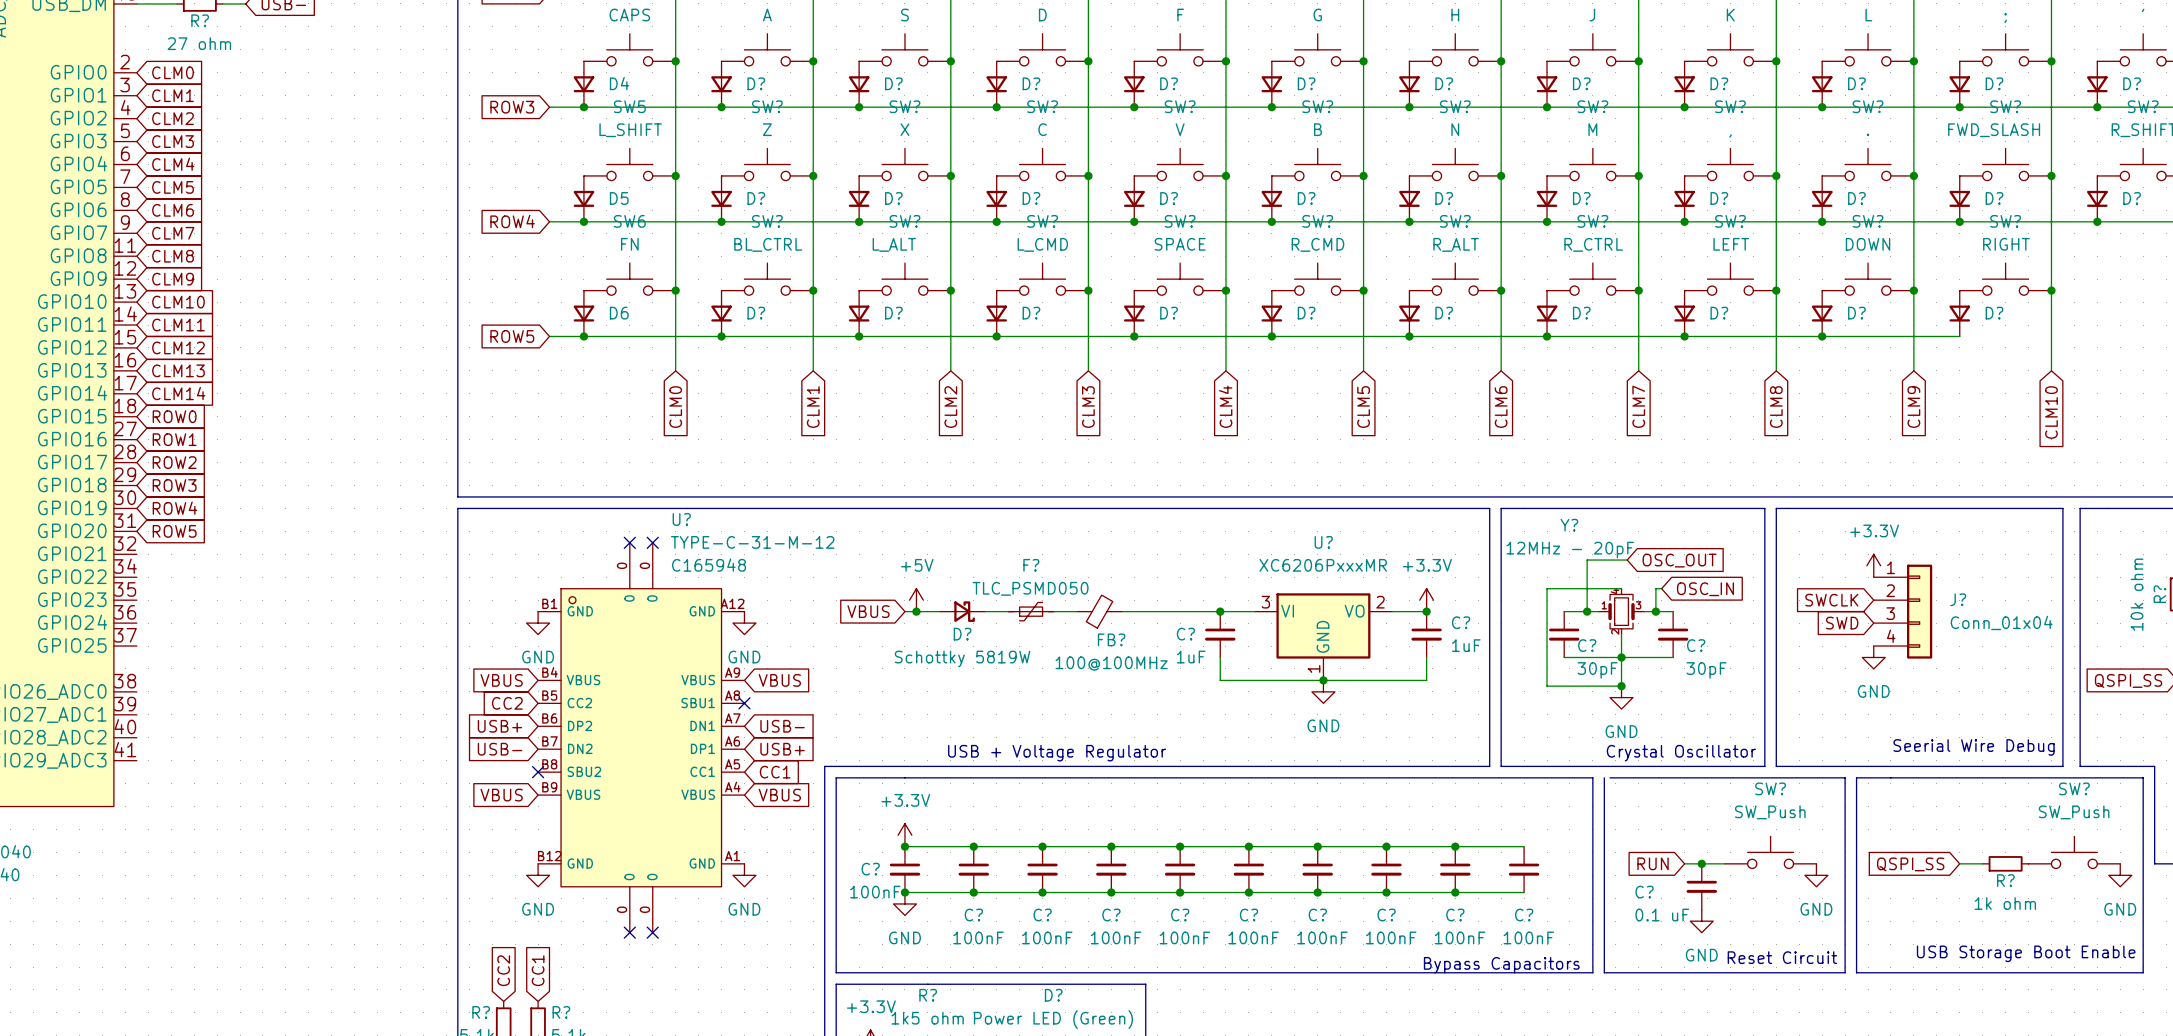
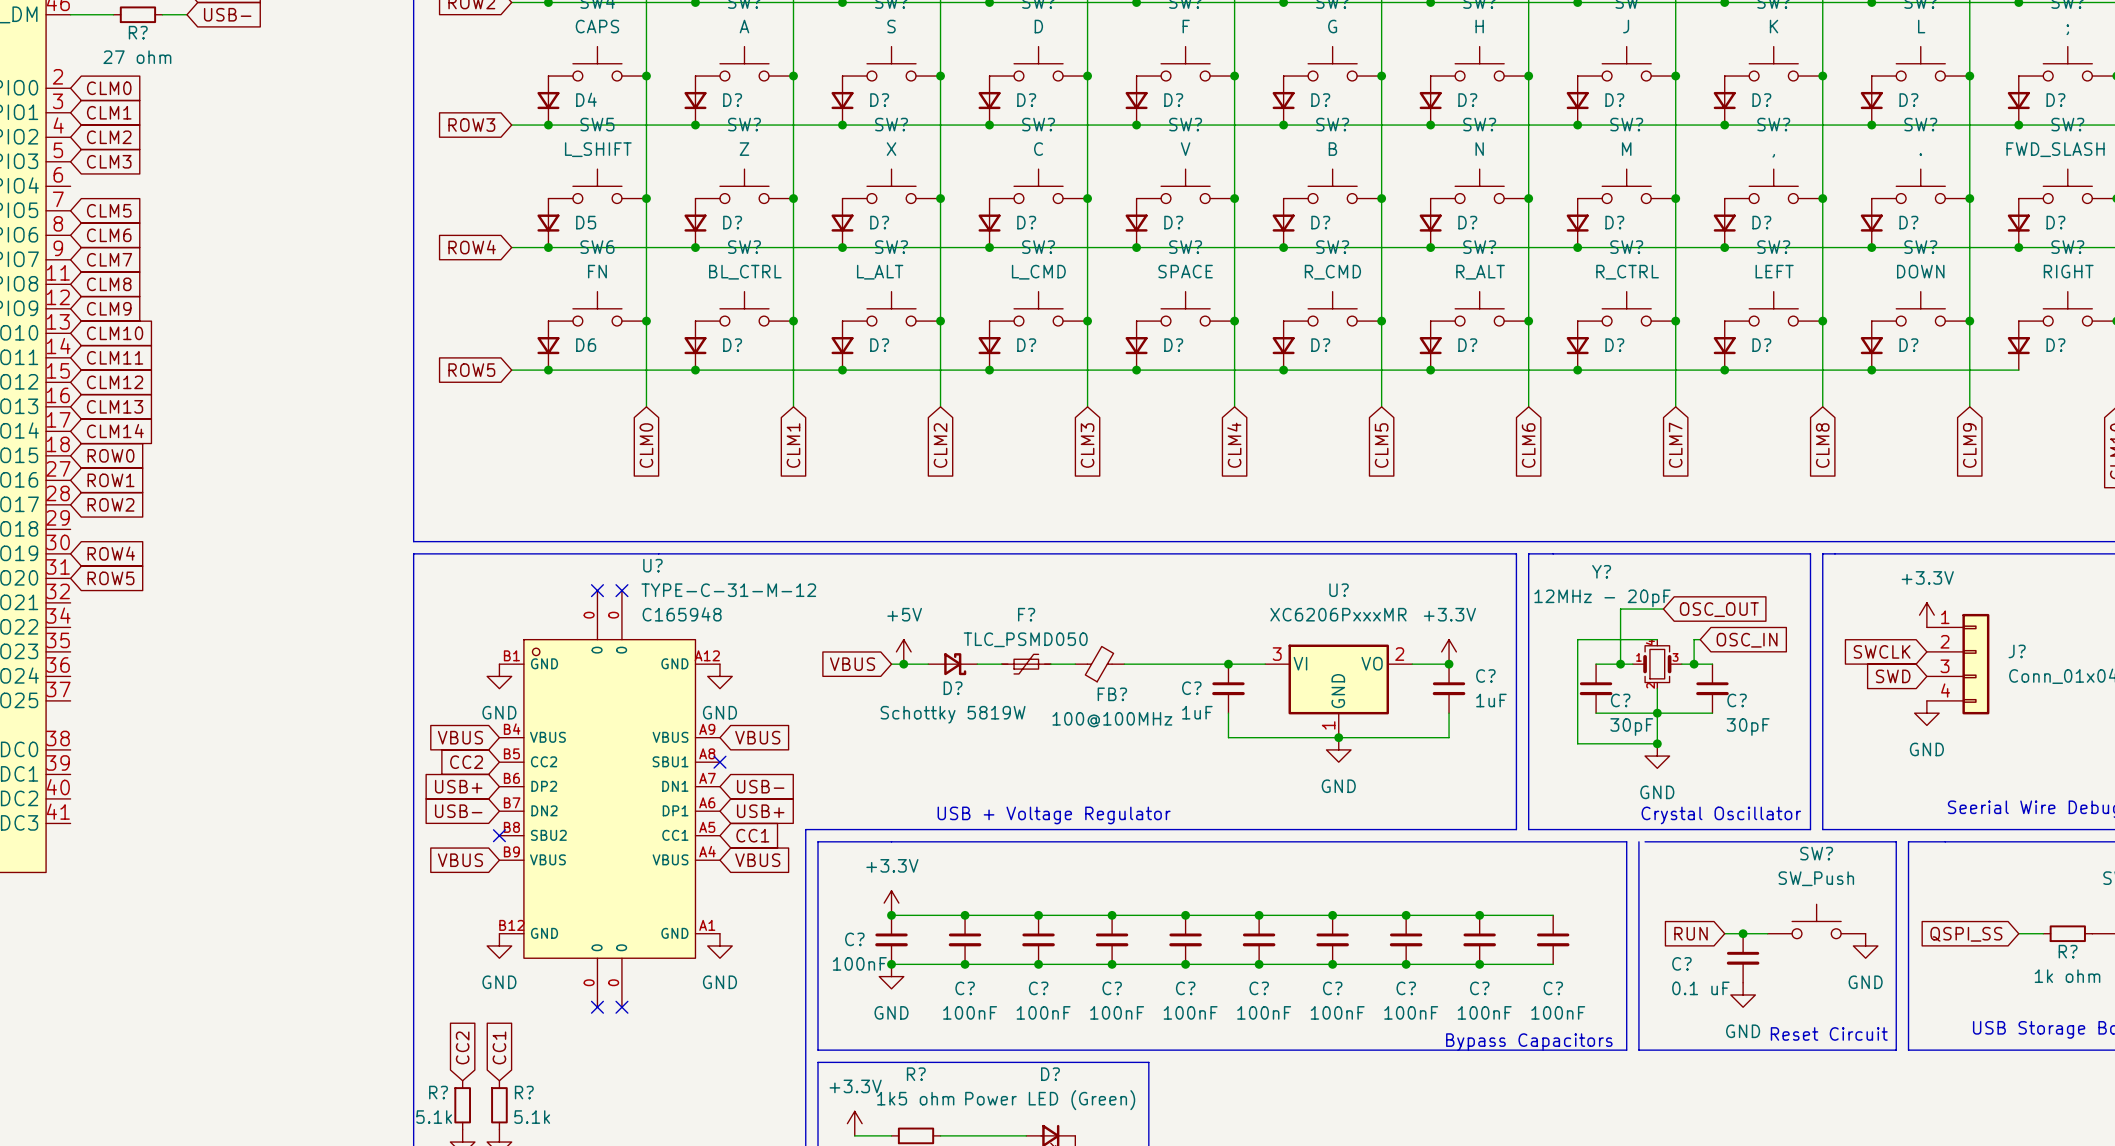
global label: CLM4 (173, 164) -> none
global label: ROW3 (174, 485) -> none

